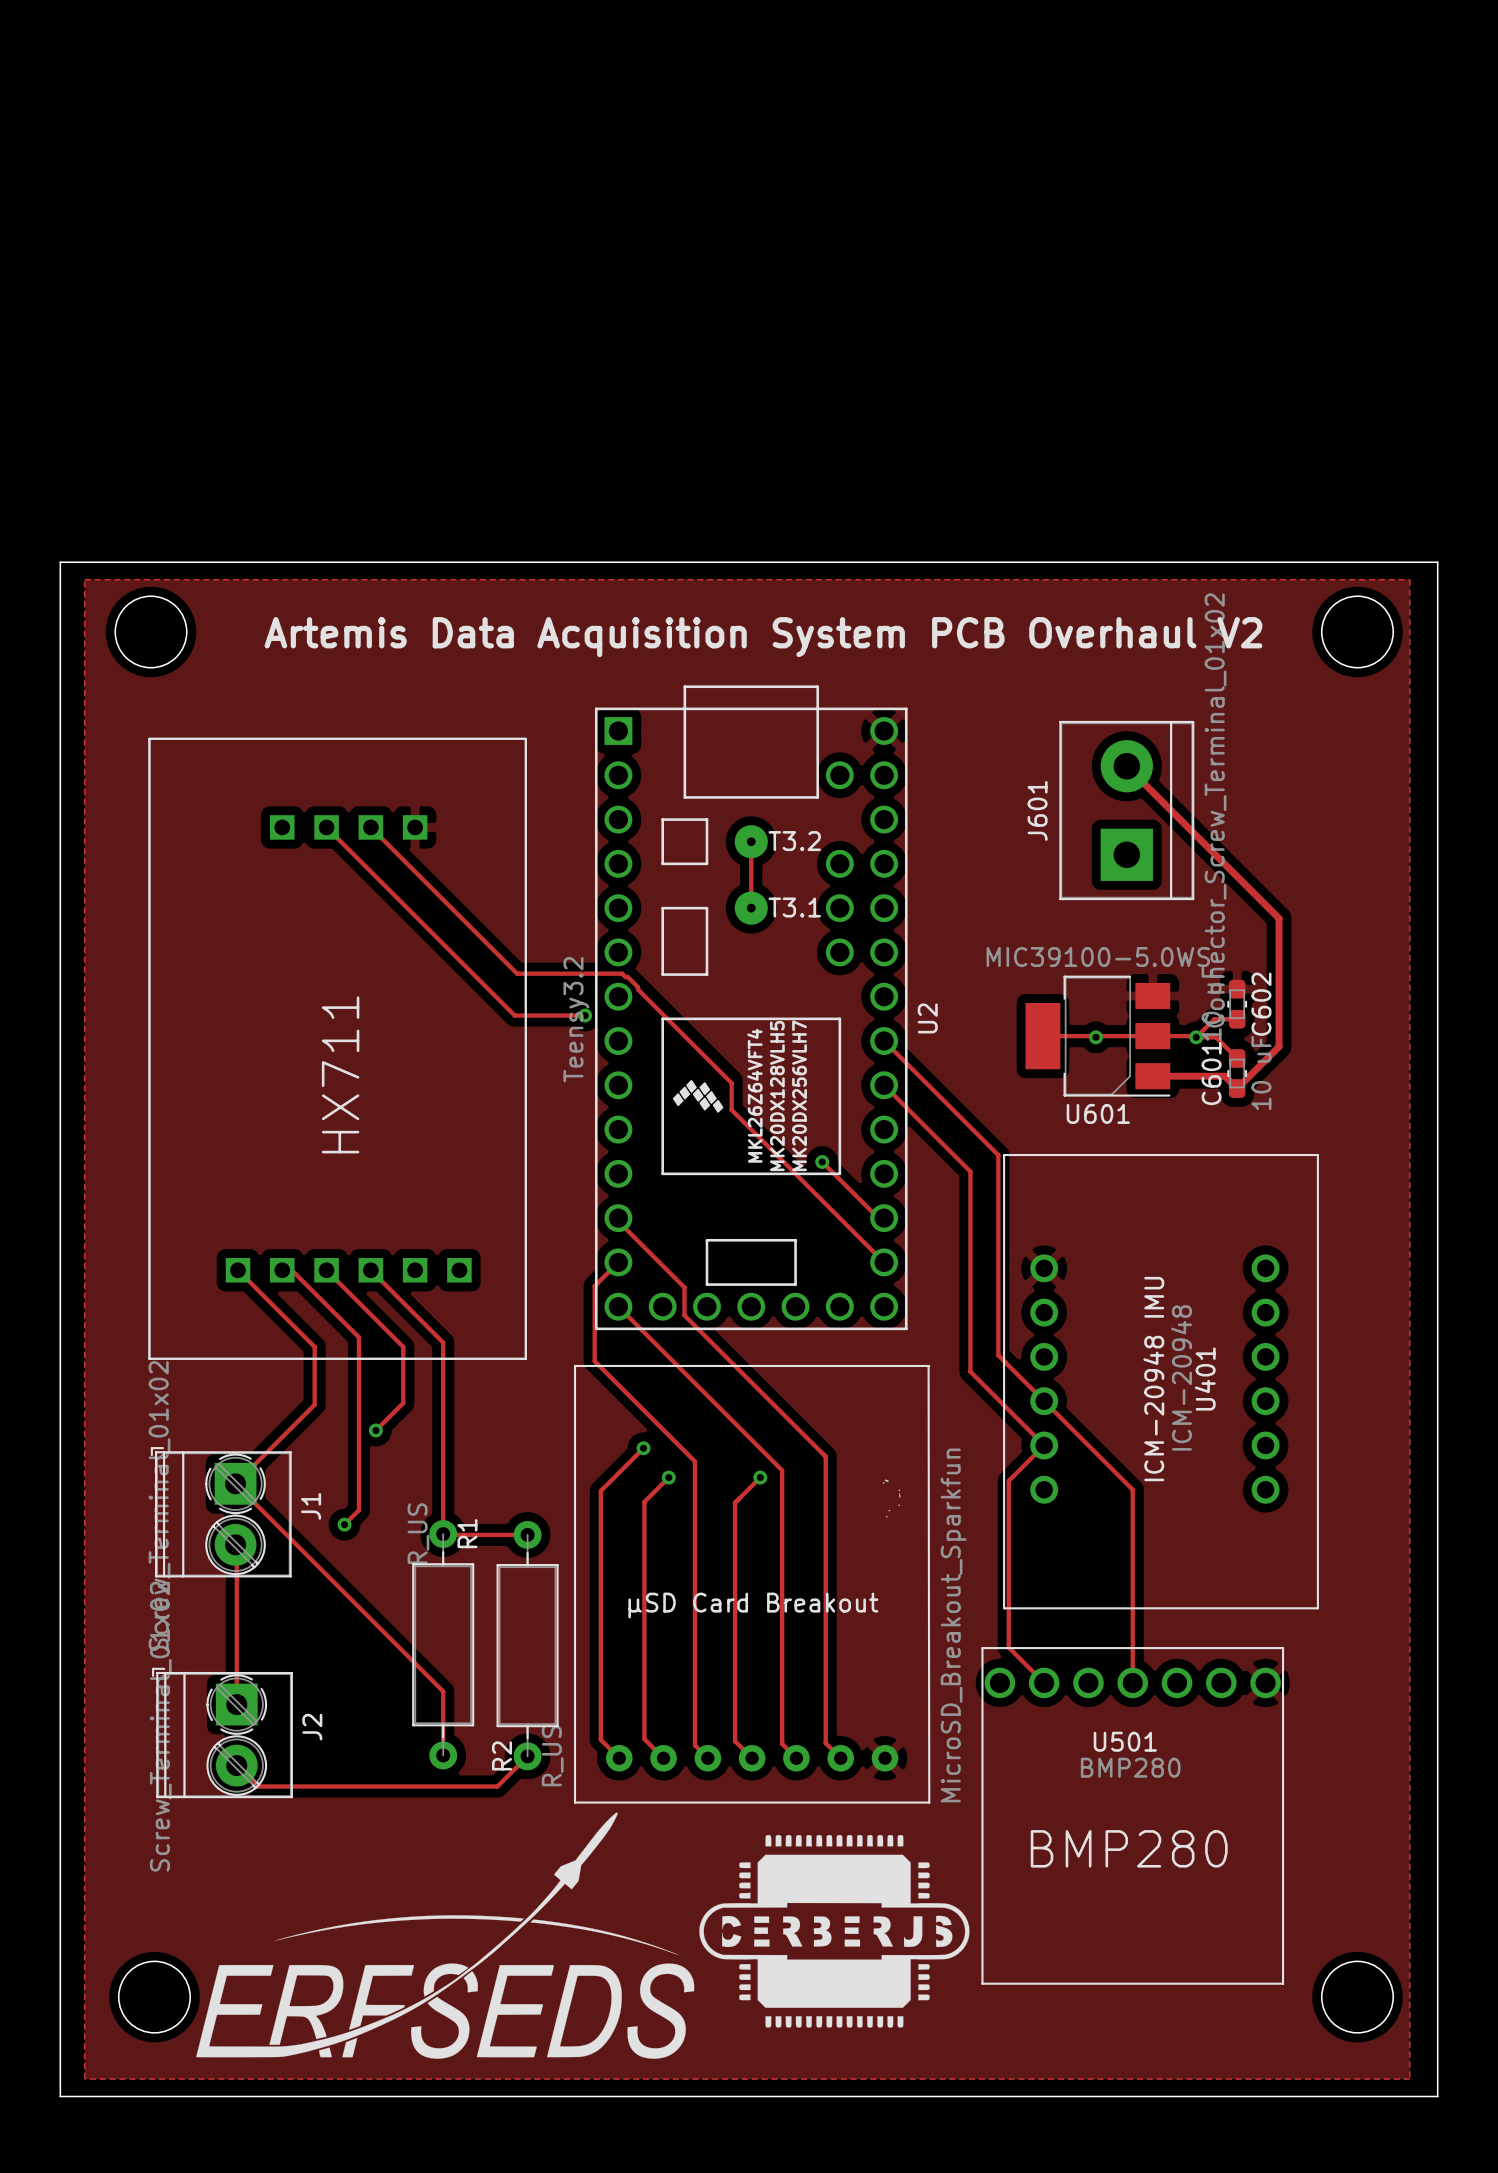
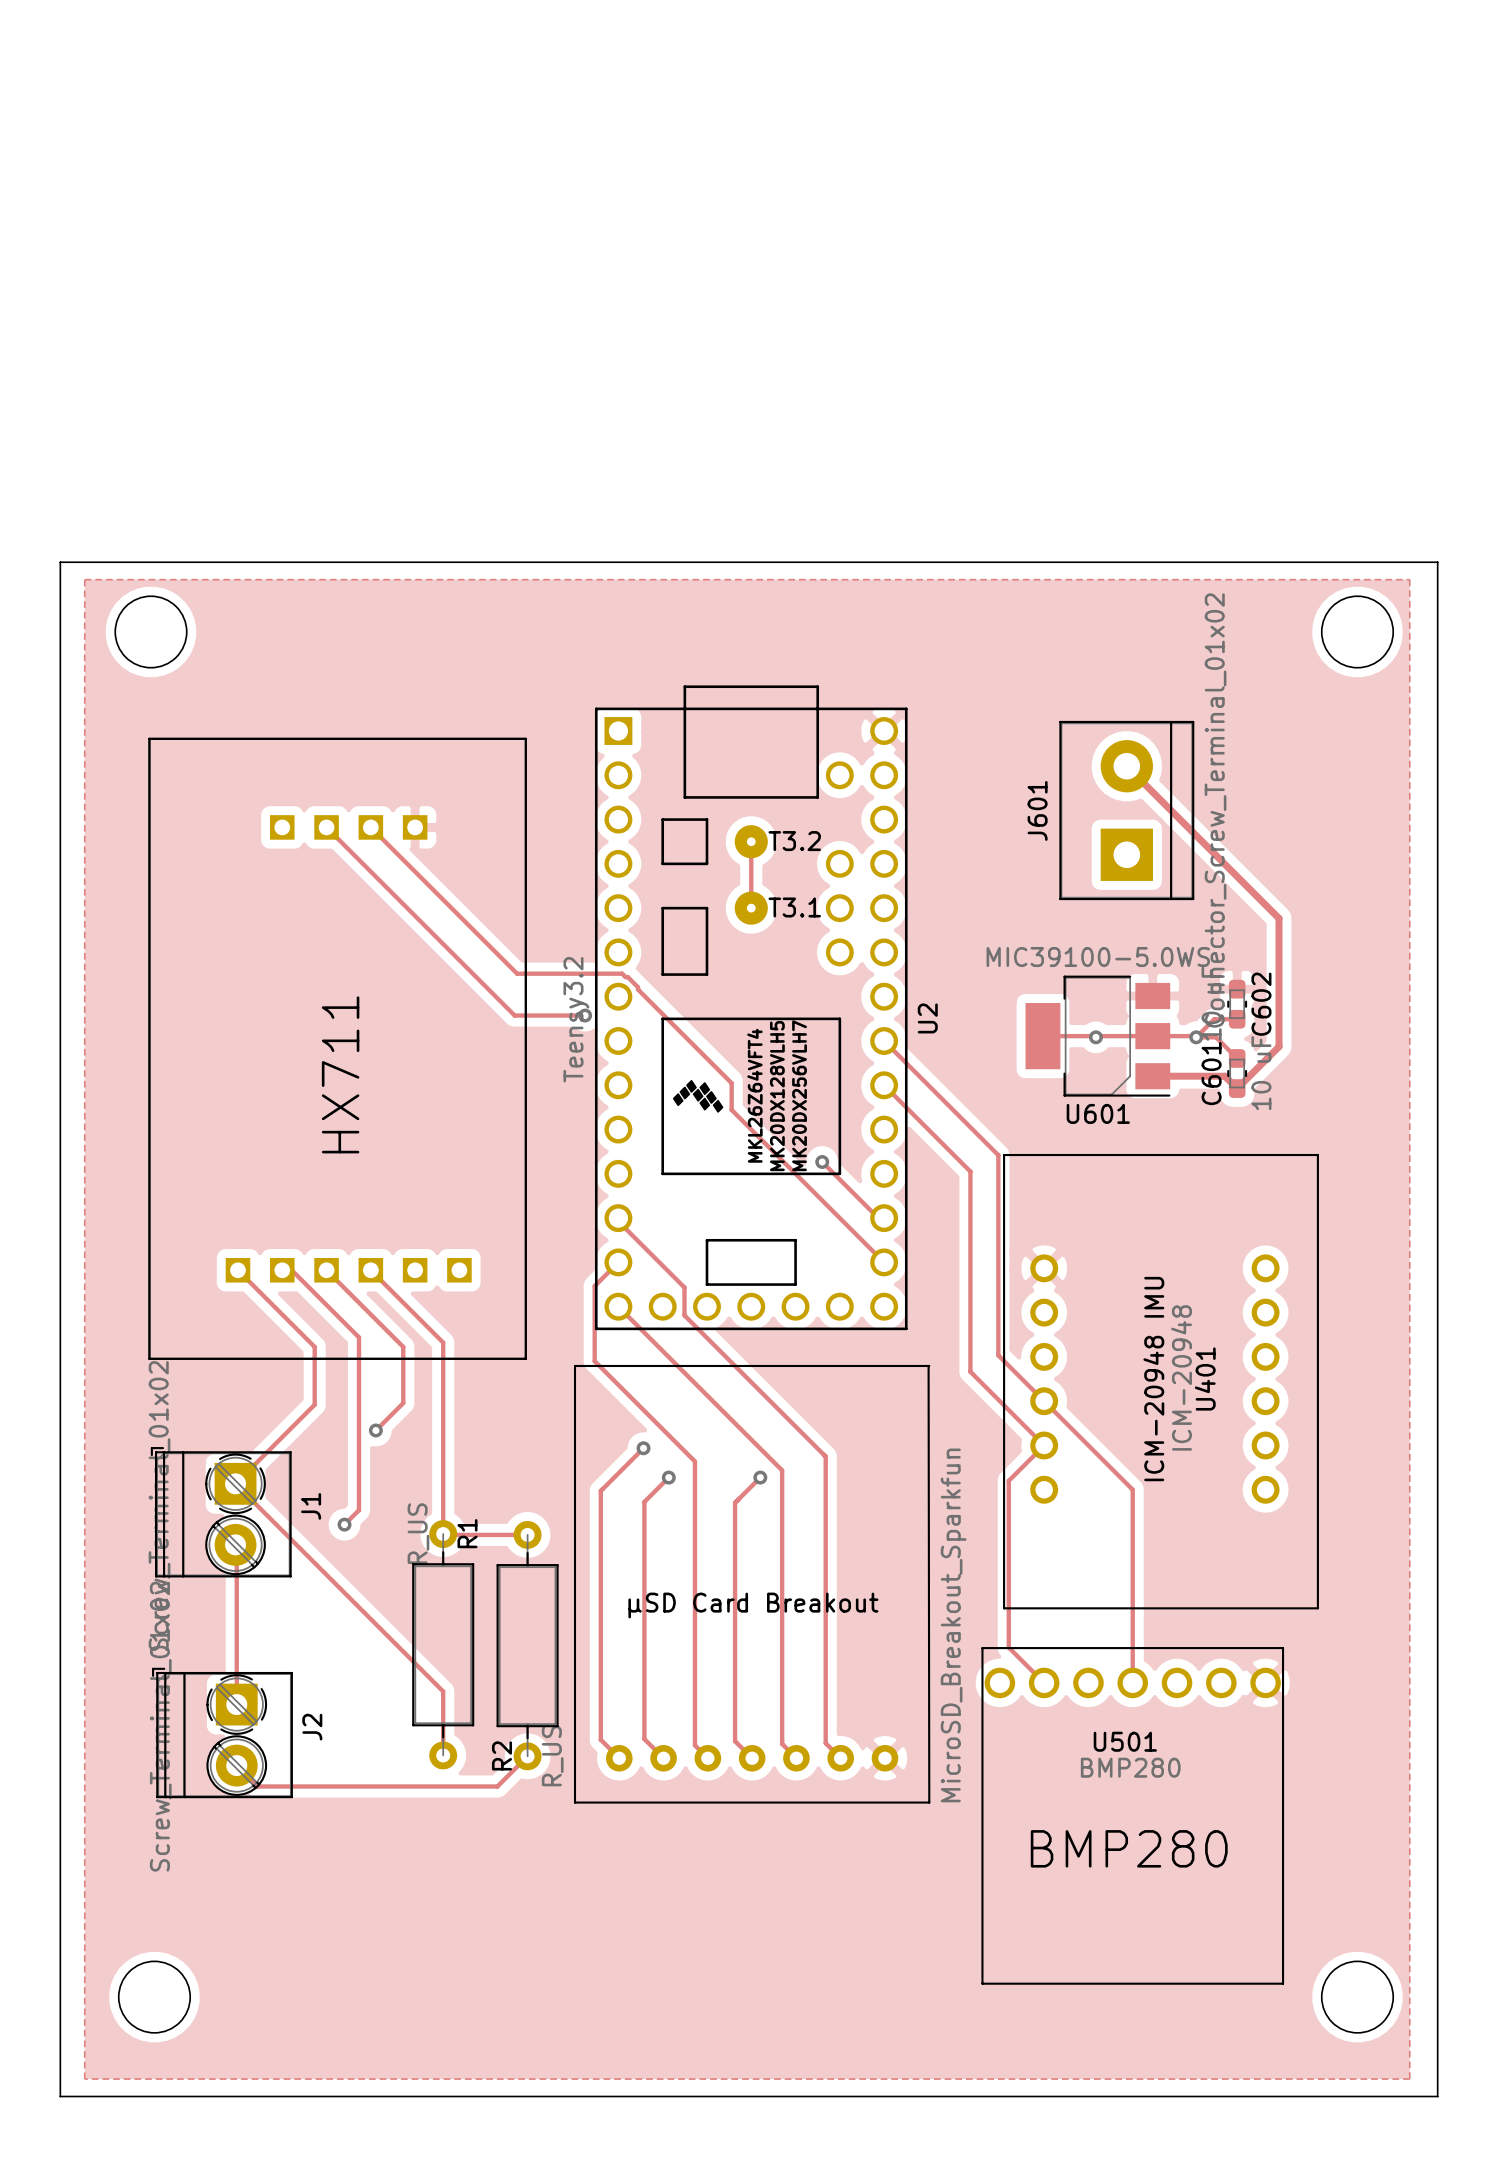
text: Artemis Data Acquisition System PCB Overhaul V2 (763, 637) -> none
drawing: [883, 1479, 901, 1518] -> none
drawing: [196, 1812, 970, 2059] -> none

